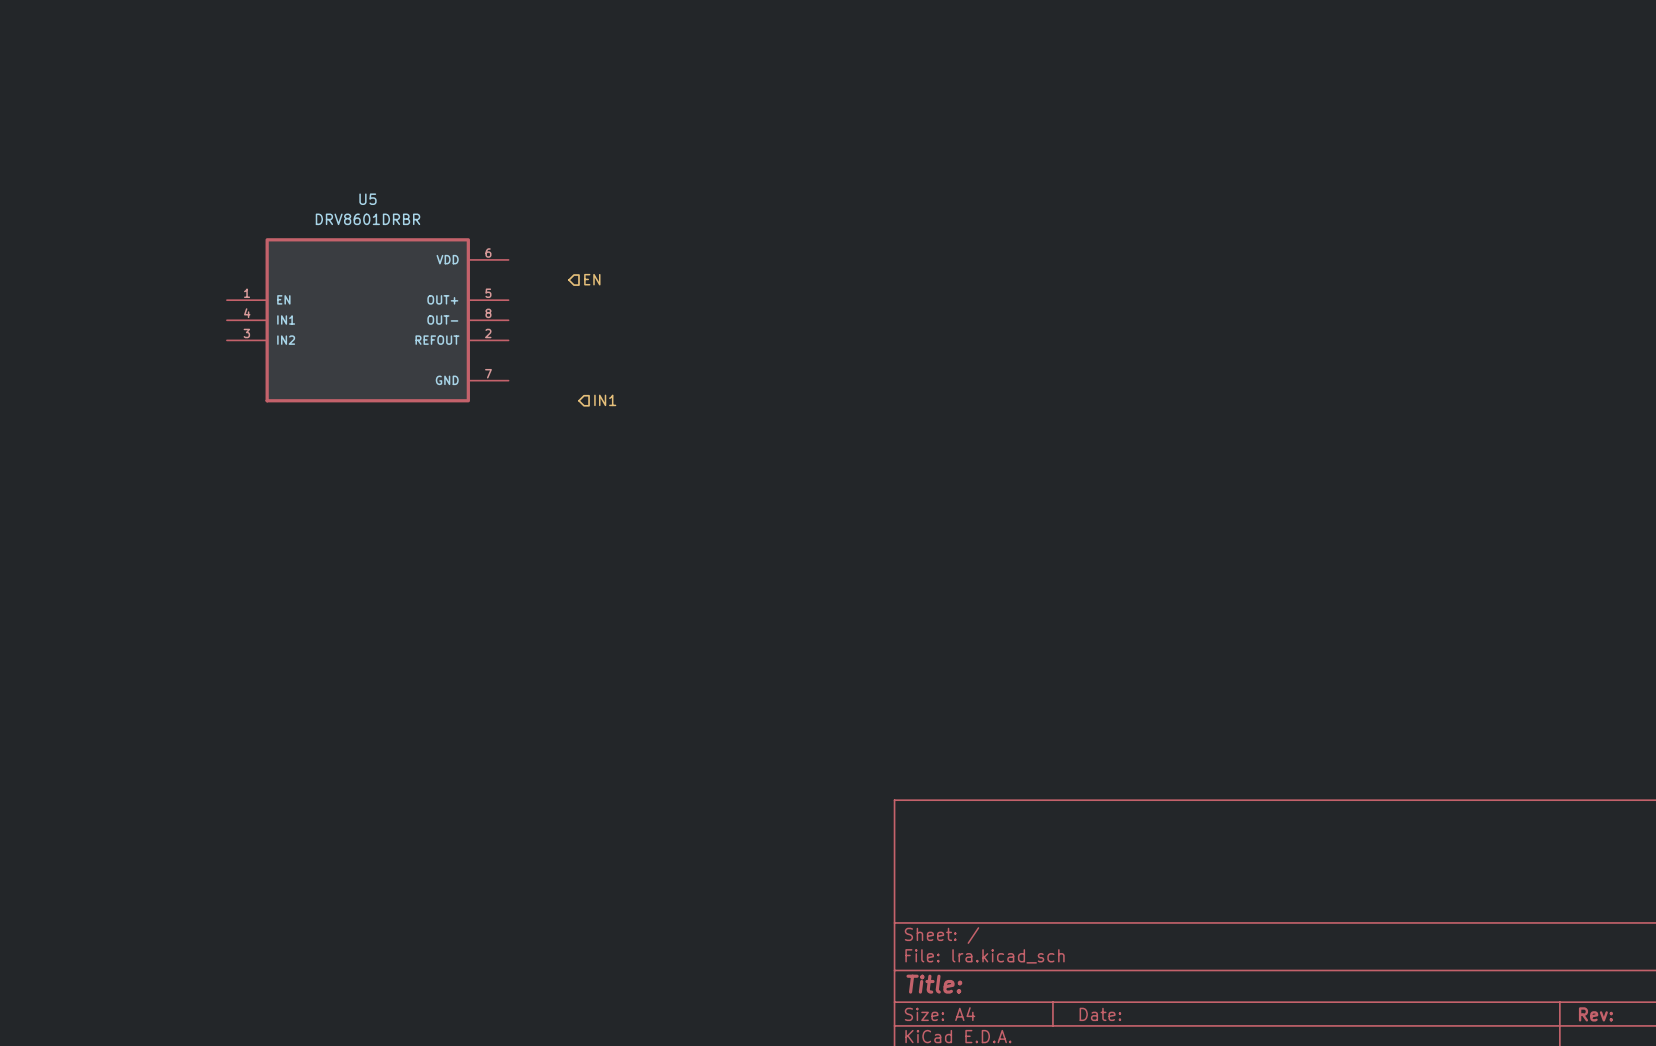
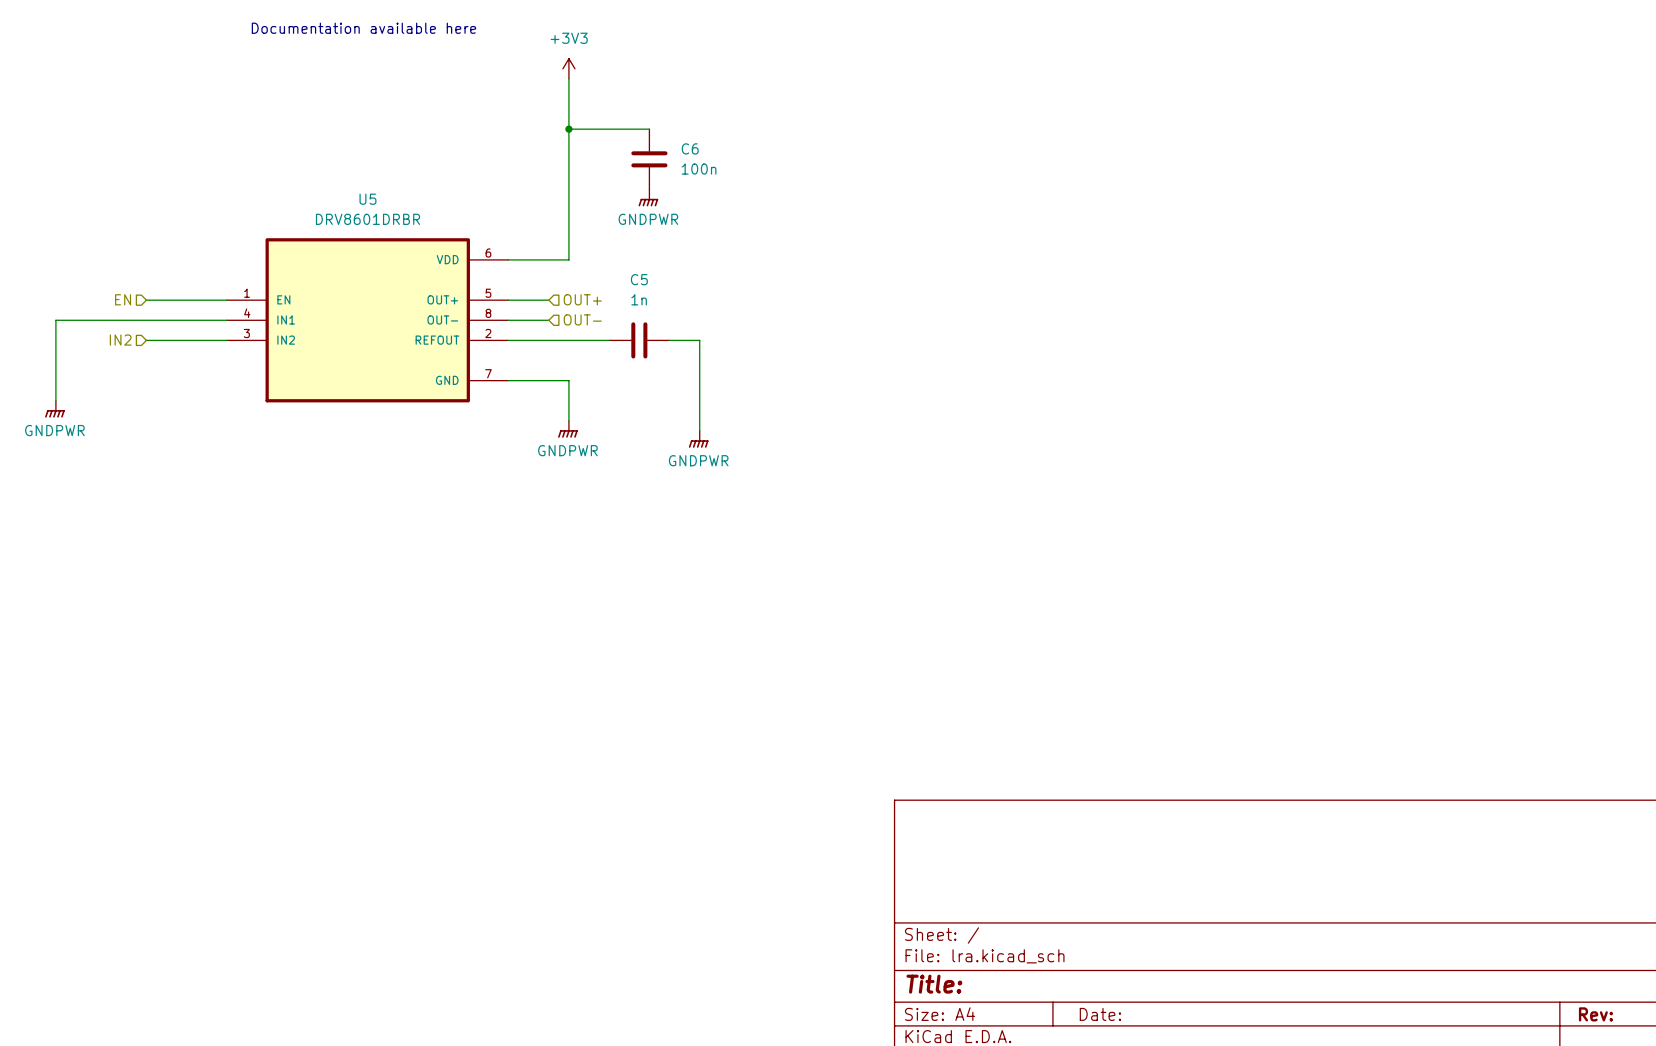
text: none -> Documentation available here (363, 28)
power symbol: none -> +3V3 (568, 68)
wire: none -> (568, 78) (568, 259) (508, 259)
wire: none -> (568, 129) (649, 129)
junction: none -> (568, 129)
C6: none -> 100n (649, 159)
power symbol: none -> GNDPWR (648, 197)
hierarchical label: EN (592, 279) -> none
hierarchical label: none -> EN (123, 299)
hierarchical label: none -> OUT+ (582, 299)
wire: none -> (146, 300) (226, 300)
wire: none -> (508, 300) (548, 300)
hierarchical label: none -> OUT- (582, 319)
wire: none -> (226, 320) (55, 320) (55, 400)
wire: none -> (508, 320) (548, 320)
hierarchical label: none -> IN2 (120, 340)
wire: none -> (146, 340) (226, 340)
wire: none -> (508, 340) (609, 340)
C5: none -> 1n (639, 340)
wire: none -> (669, 340) (699, 340) (699, 430)
wire: none -> (508, 380) (568, 380) (568, 420)
hierarchical label: IN1 (605, 400) -> none
power symbol: none -> GNDPWR (54, 409)
power symbol: none -> GNDPWR (567, 429)
power symbol: none -> GNDPWR (698, 439)

